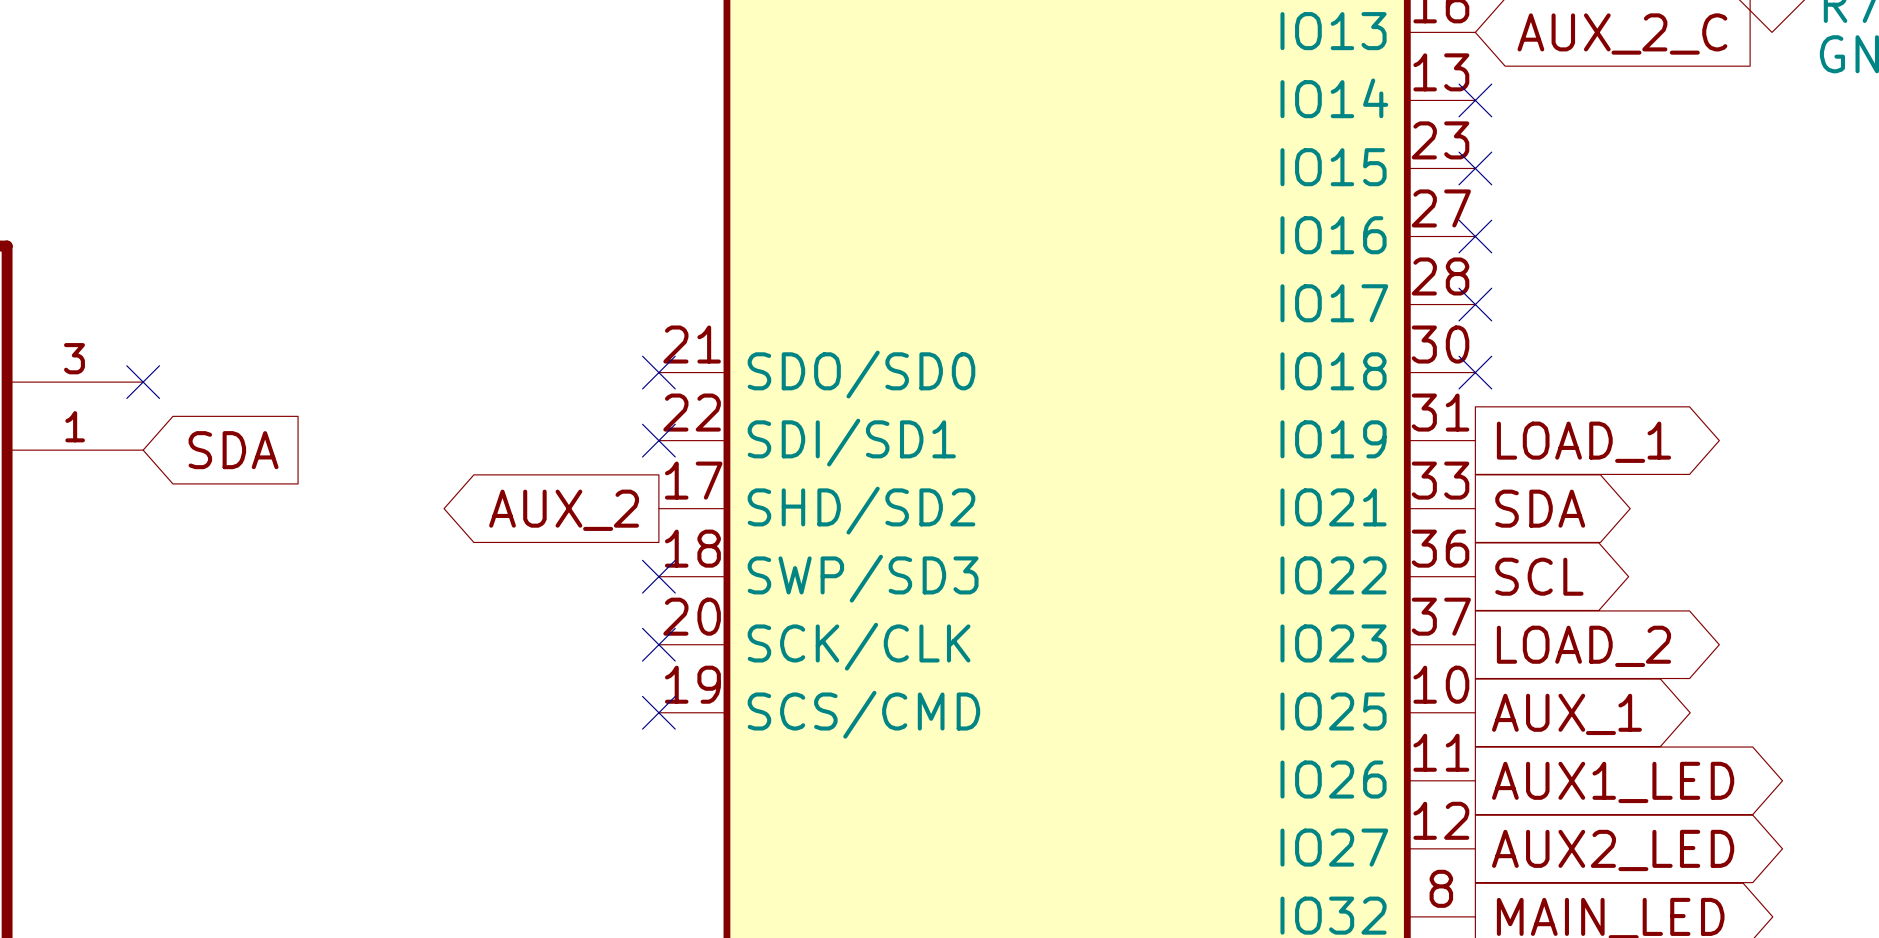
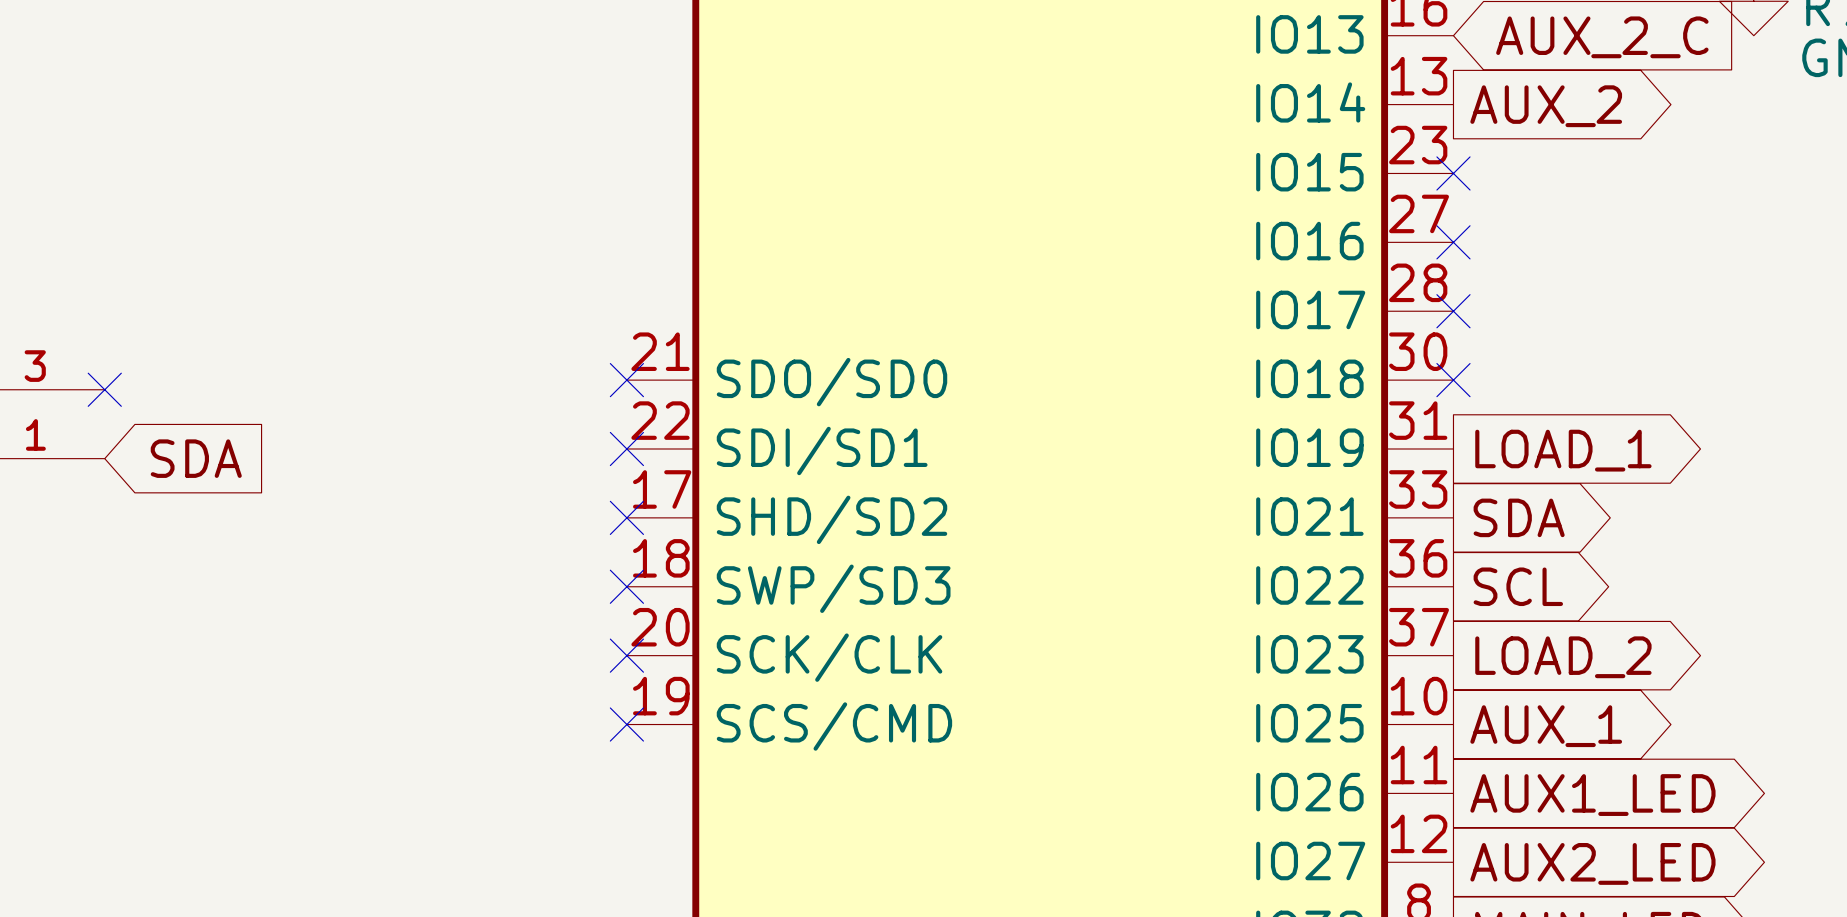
no-connect mark: (1475, 100) -> none
global label: none -> AUX_2 (1546, 106)
no-connect mark: none -> (626, 517)
global label: AUX_2 (564, 510) -> none

